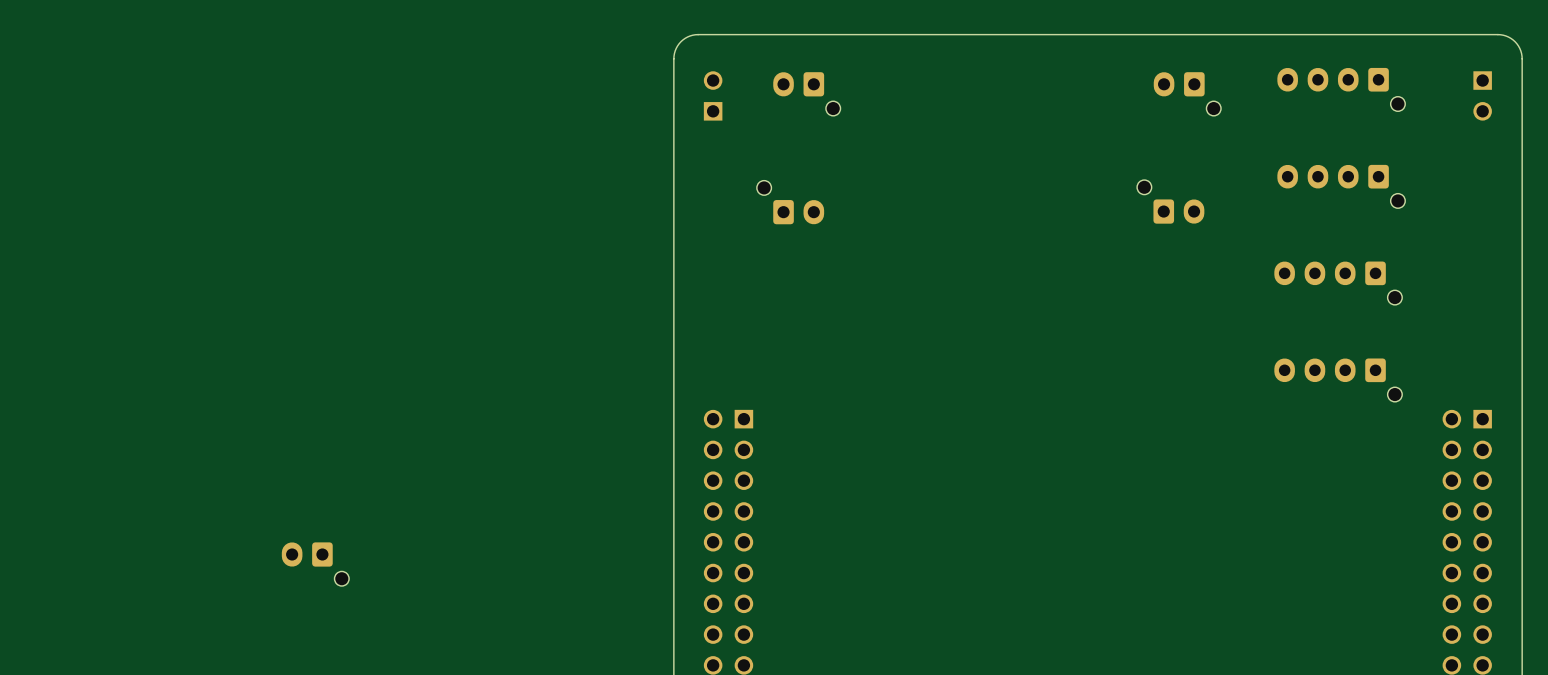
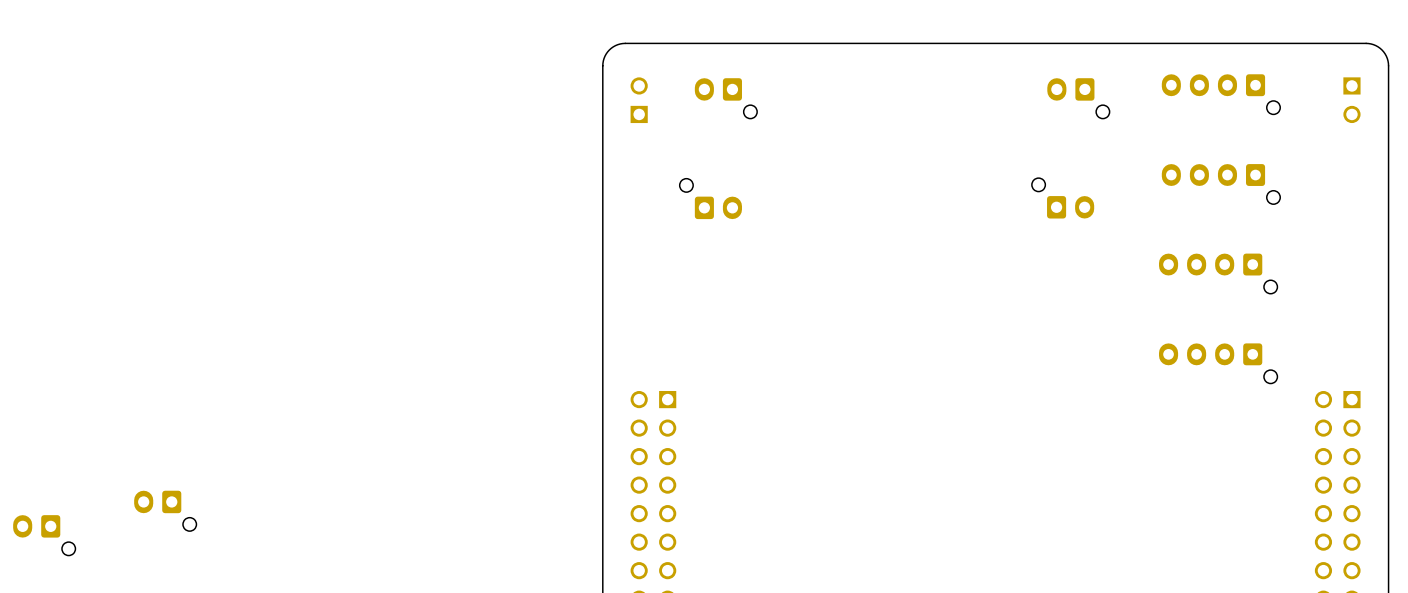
part position: (315, 564) -> (165, 510)
part: none -> (44, 535)

